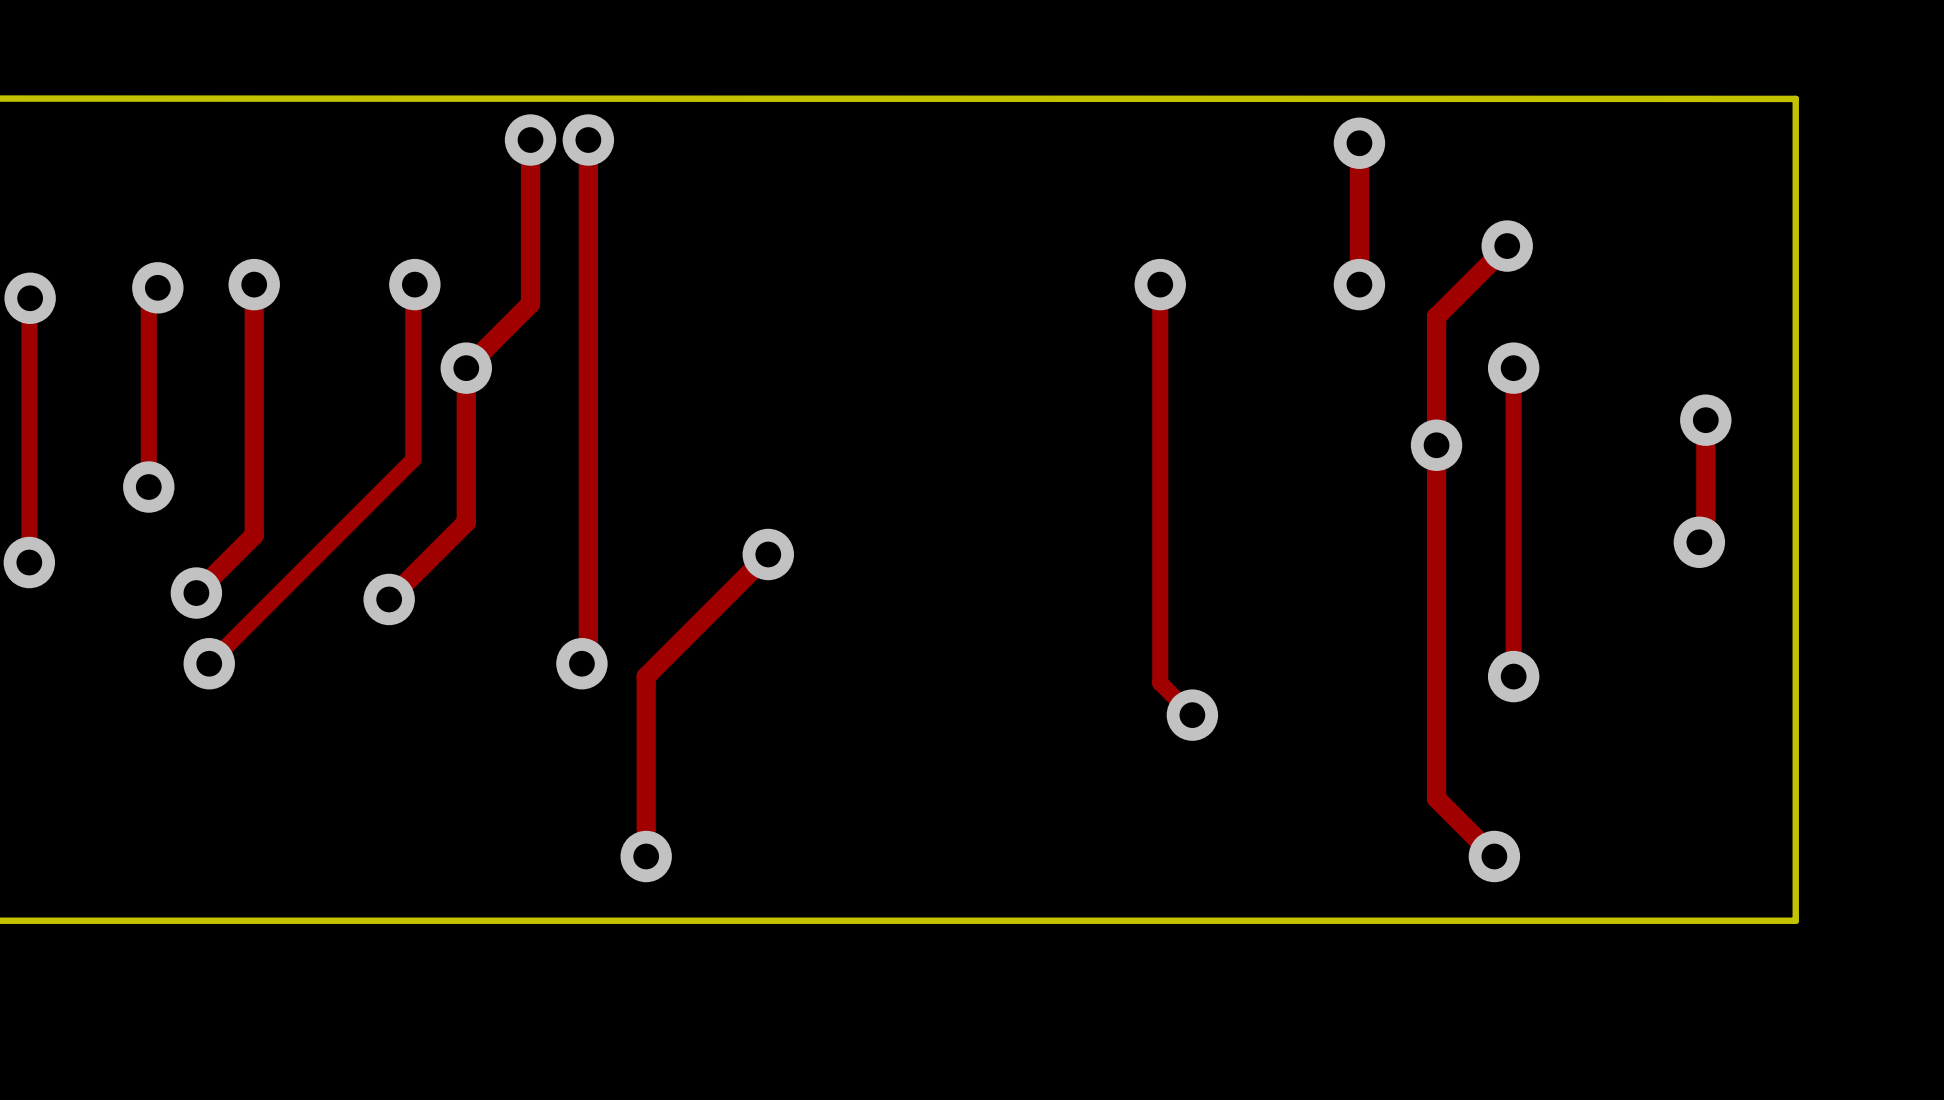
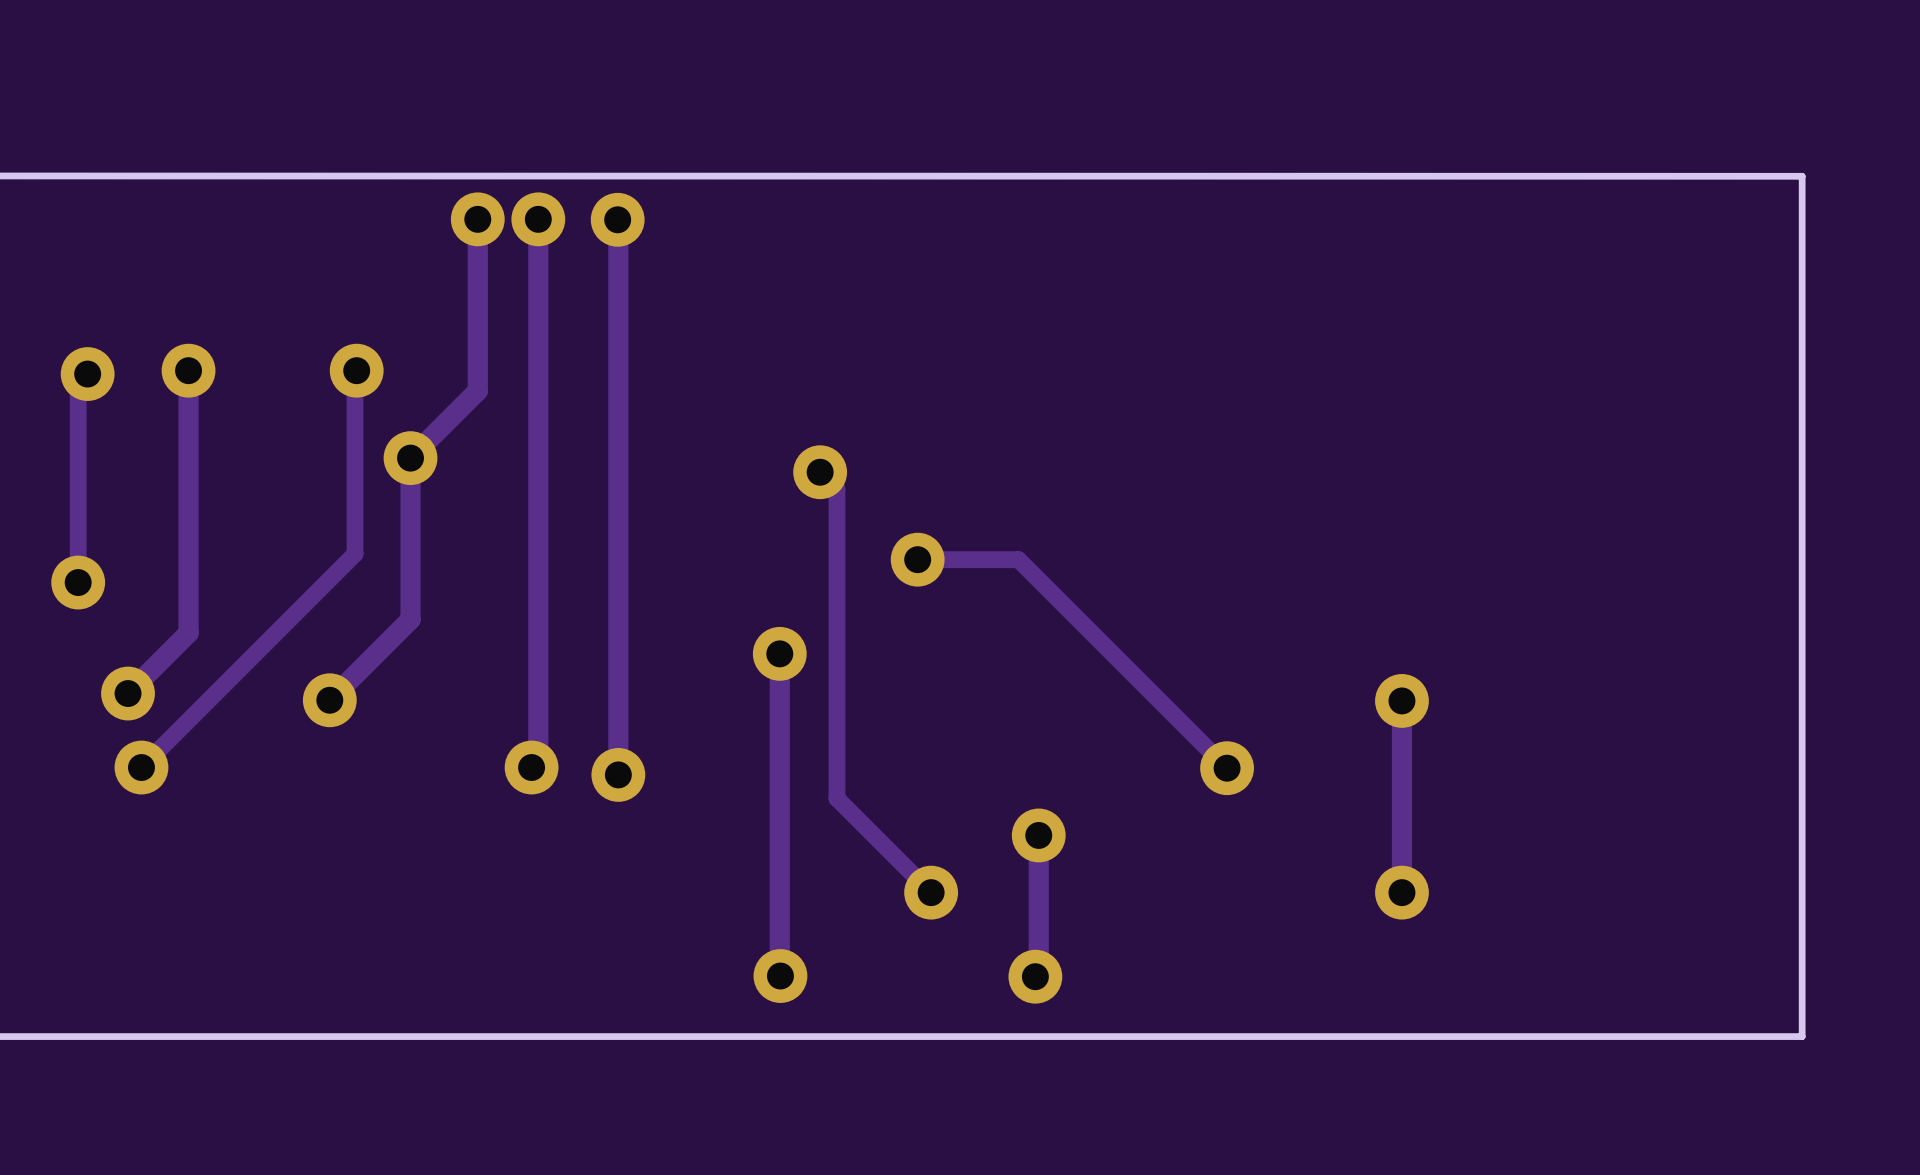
via: none -> (617, 219)
track: none -> (618, 220) (618, 774)
track: (1359, 143) (1359, 284) -> none
via: (1359, 143) -> none
track: (1507, 246) (1436, 316) (1436, 798) (1494, 856) -> none
via: (1507, 246) -> none
track: (1160, 284) (1160, 683) (1192, 715) -> none
via: (1160, 284) -> none
via: (1359, 284) -> none
track: (1513, 368) (1513, 676) -> (779, 653) (779, 975)
via: (1513, 368) -> none
via: none -> (820, 472)
track: none -> (827, 472) (820, 472) (836, 489) (836, 798) (931, 892)
track: (1705, 420) (1705, 535) (1699, 542) -> none
via: (1705, 420) -> none
via: (1436, 445) -> none
track: none -> (917, 559) (1018, 559) (1227, 768)
via: none -> (917, 559)
via: (1699, 542) -> none
track: (768, 554) (646, 676) (646, 856) -> none
via position: (768, 554) -> (779, 653)
track: none -> (1401, 700) (1401, 892)
via: none -> (1401, 700)
via: none -> (1227, 768)
via: none -> (618, 774)
via: (1513, 676) -> none
via: (1192, 715) -> none
track: none -> (1038, 835) (1038, 973) (1035, 976)
via: none -> (1038, 835)
via: none -> (931, 892)
via: none -> (1401, 892)
via: (646, 856) -> none
via: (1494, 856) -> none
via: none -> (780, 976)
via: none -> (1035, 976)

